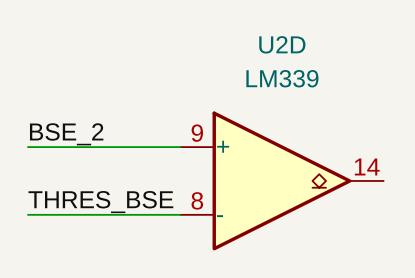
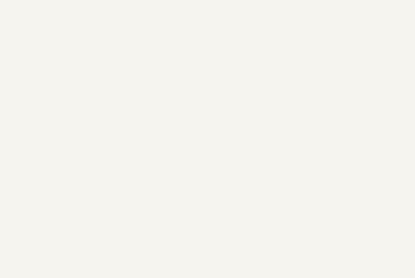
label: BSE_2 (66, 134) -> none
wire: (27, 147) (180, 147) -> none
U2D: LM339 (281, 180) -> none
label: THRES_BSE (100, 202) -> none
wire: (27, 214) (180, 214) -> none

